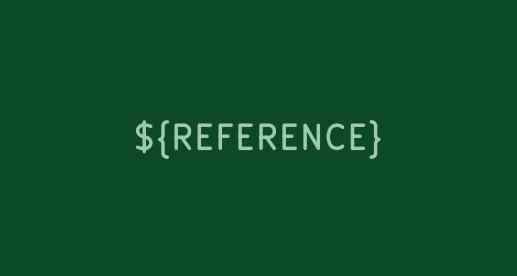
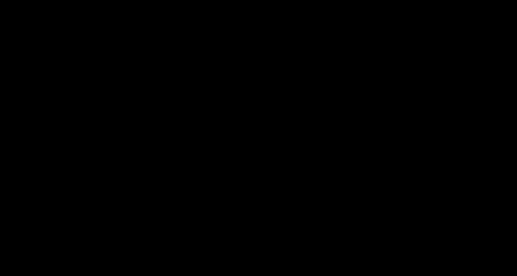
text: ${REFERENCE} (258, 139) -> none

